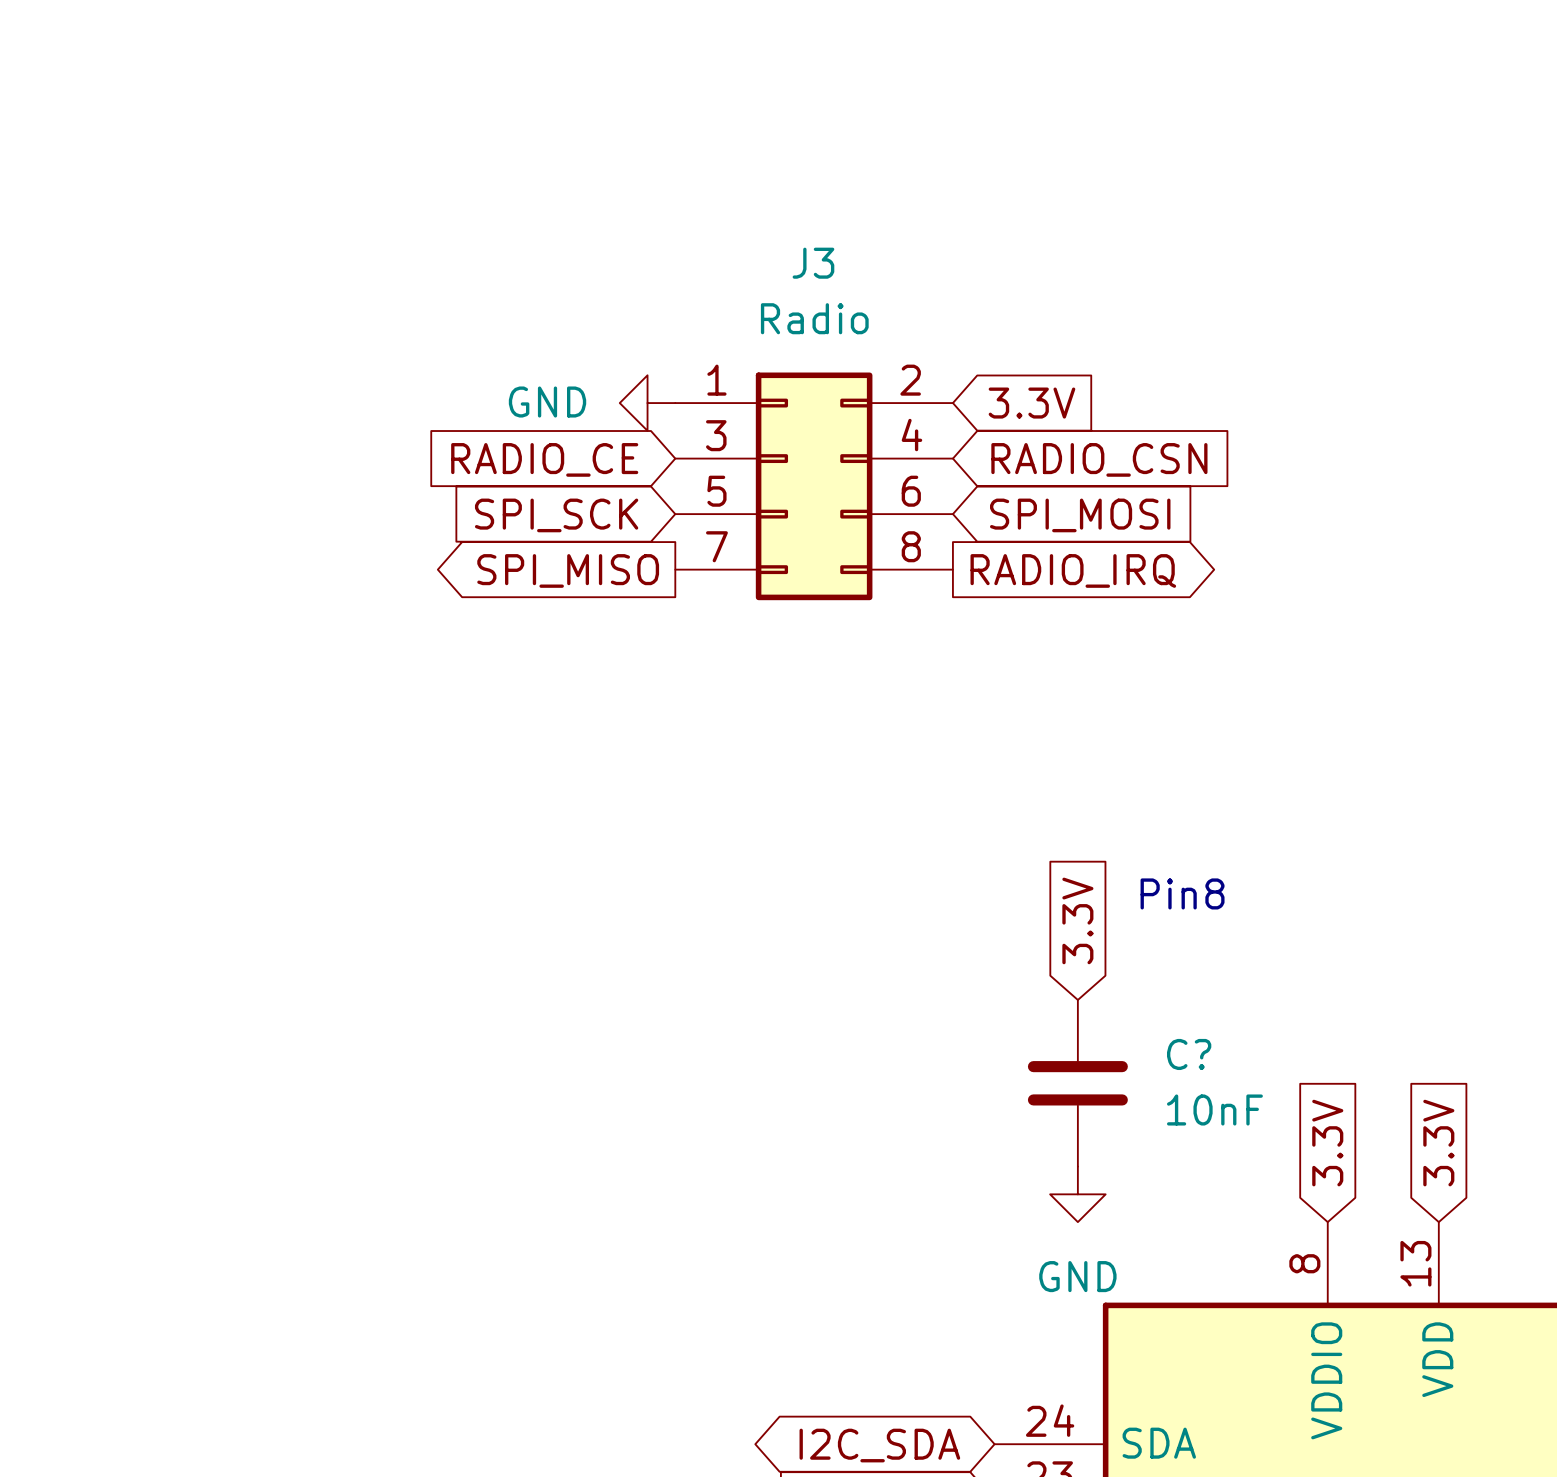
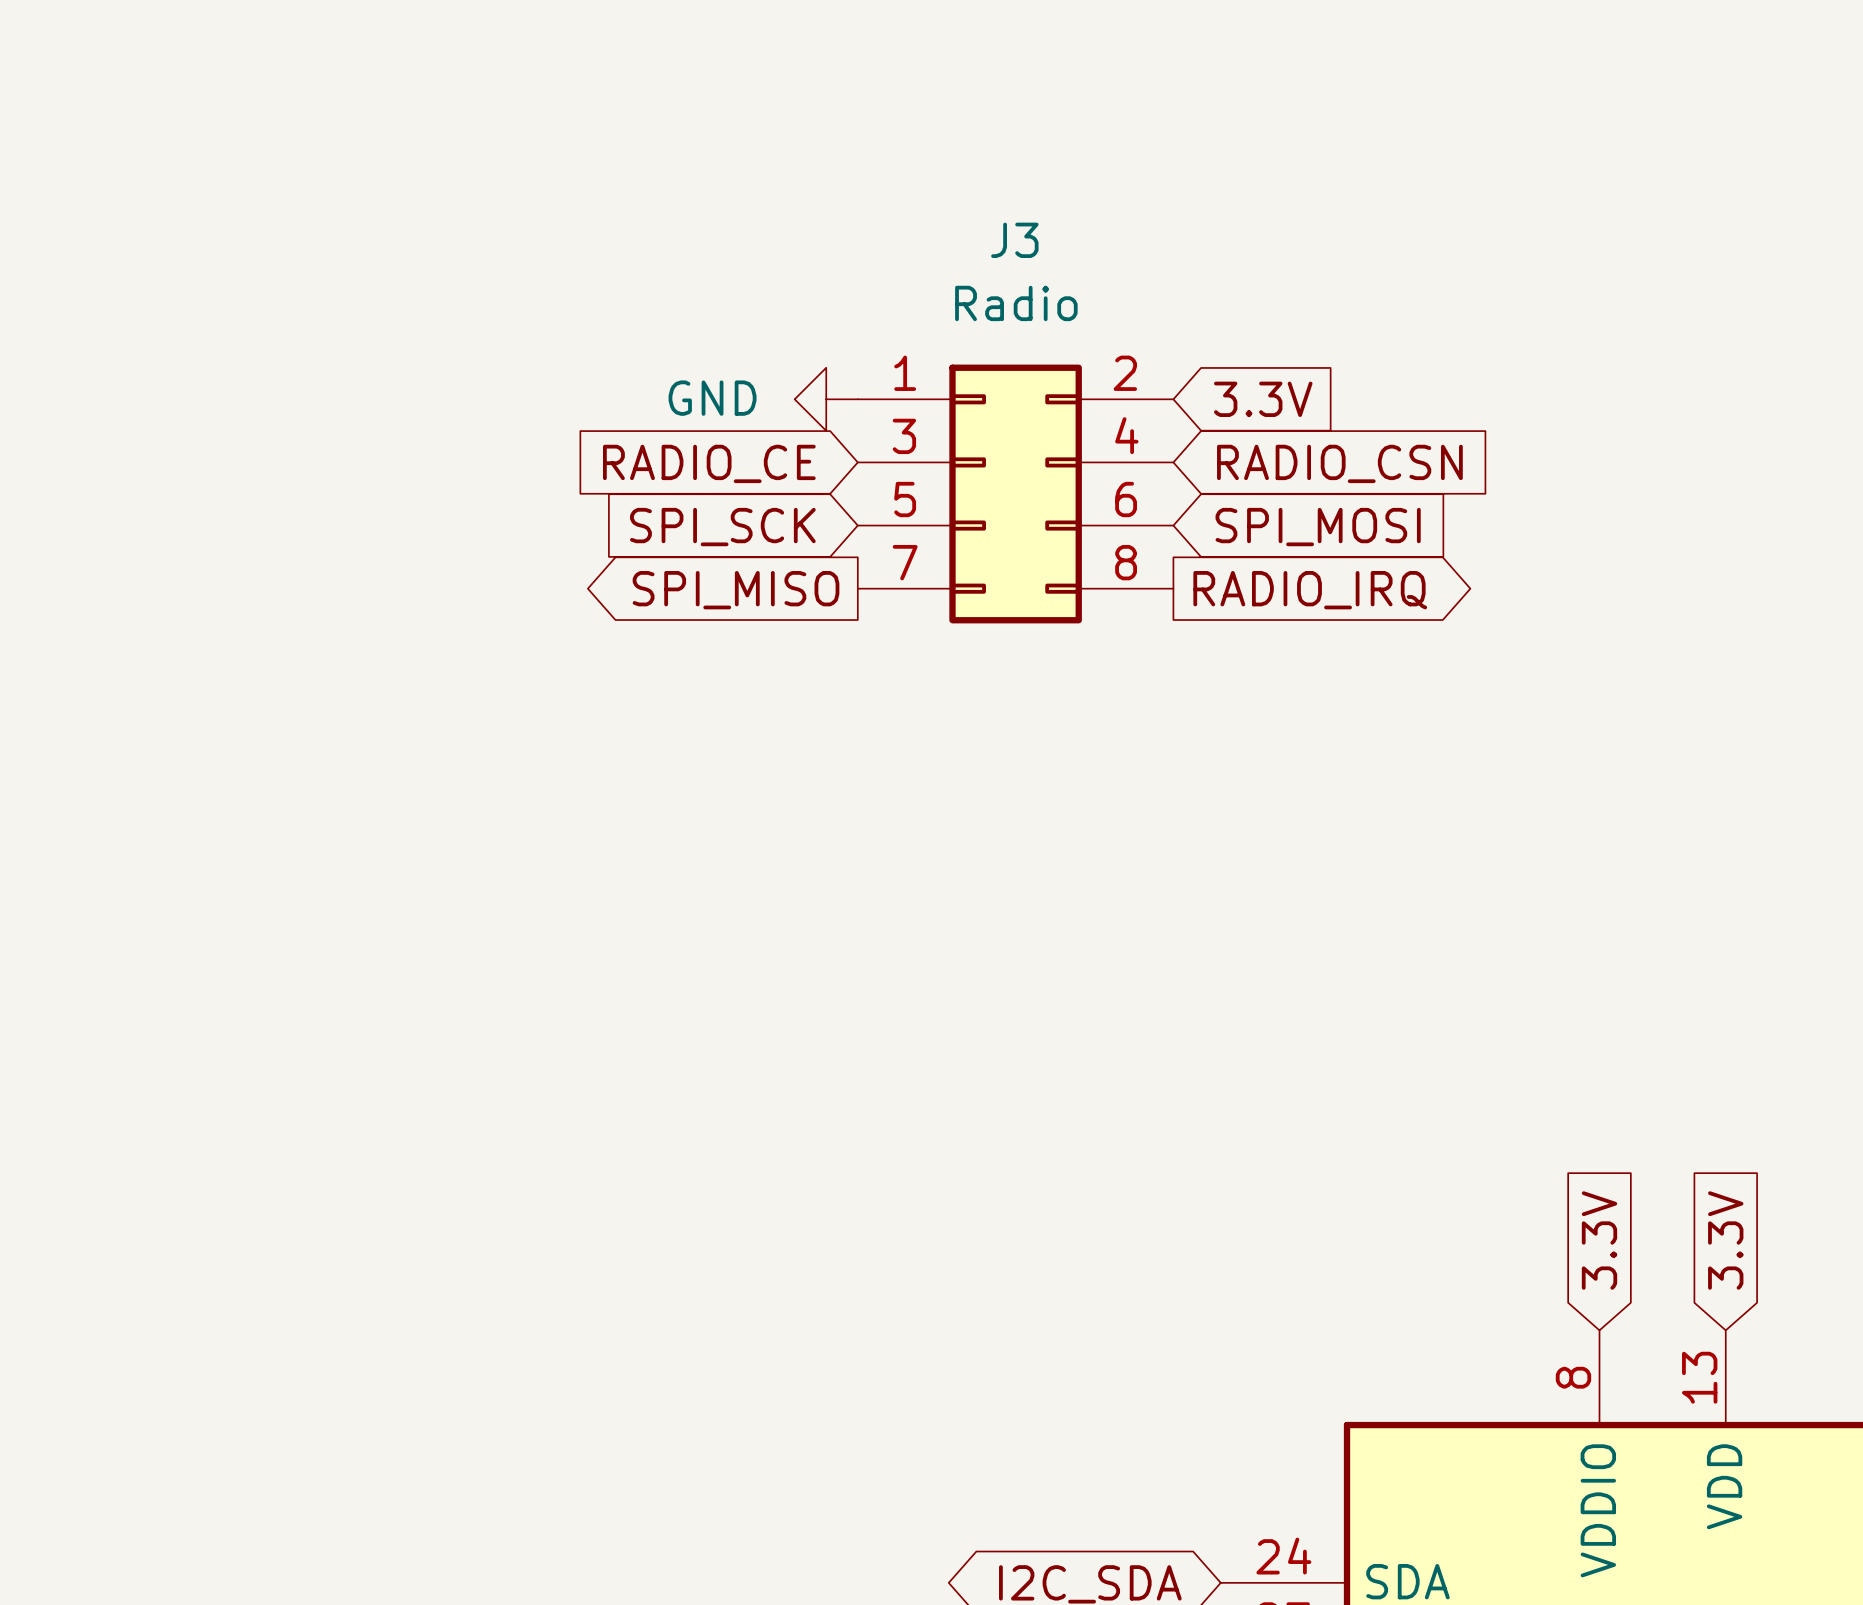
text: Pin8 (1182, 893) -> none
global label: 3.3V (1077, 920) -> none
C?: 10nF (1077, 1083) -> none
power symbol: GND (1077, 1194) -> none

